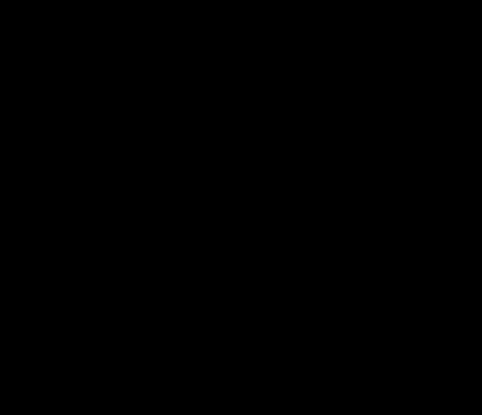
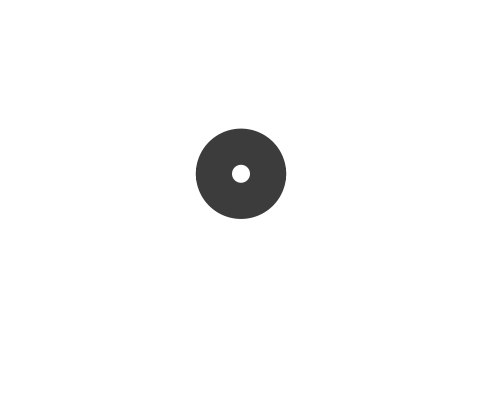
part: none -> (241, 173)

